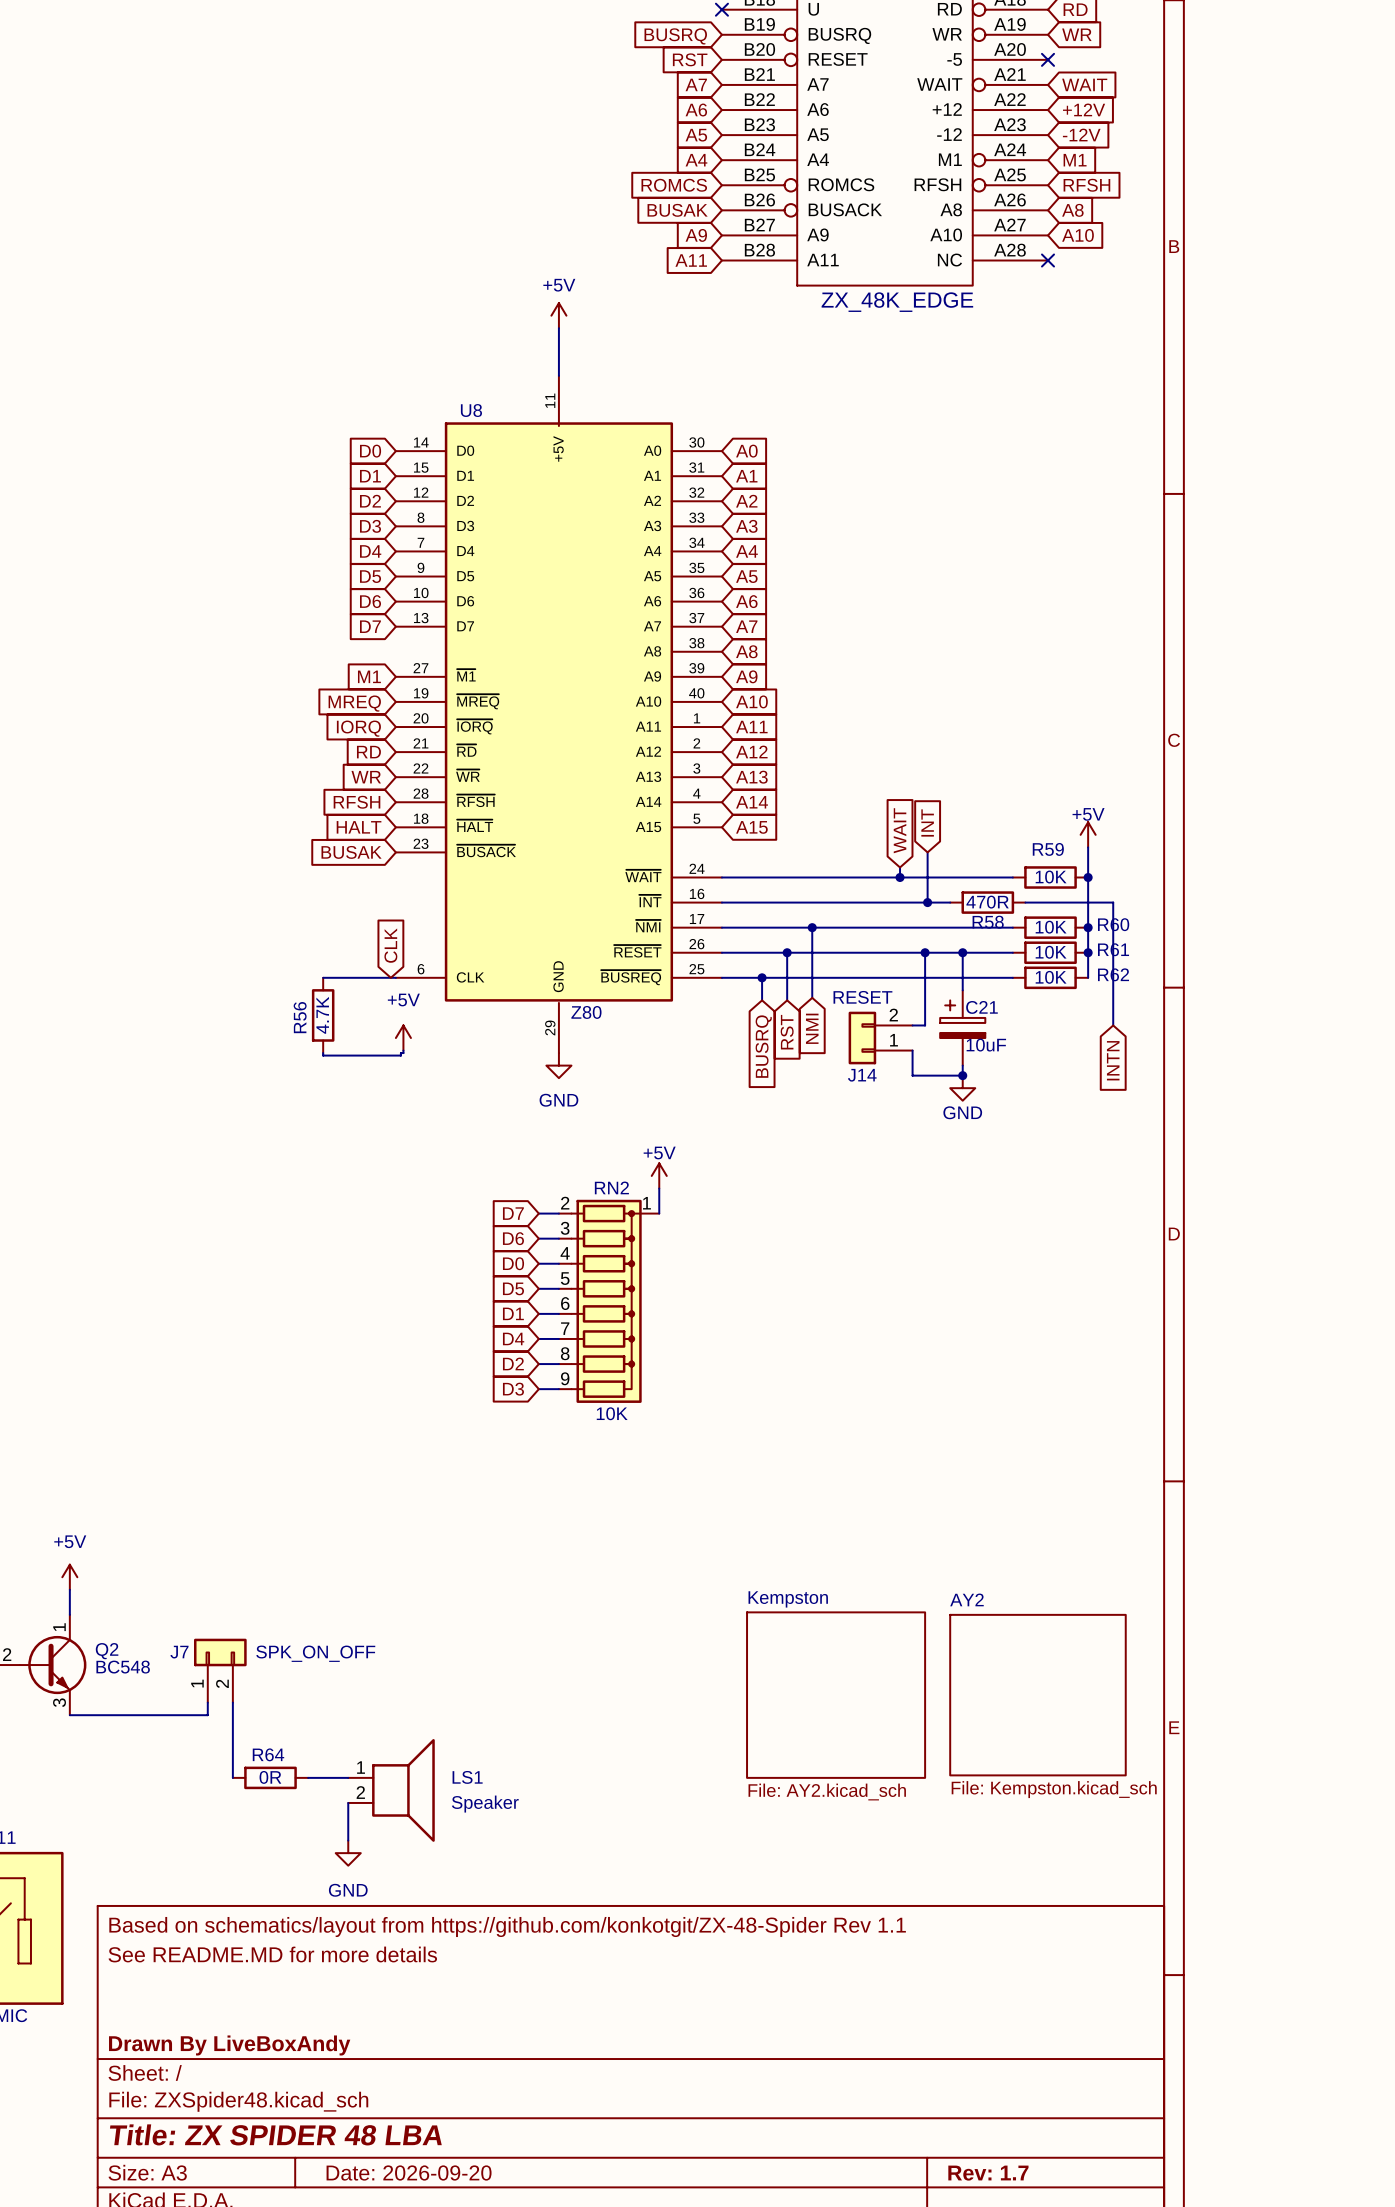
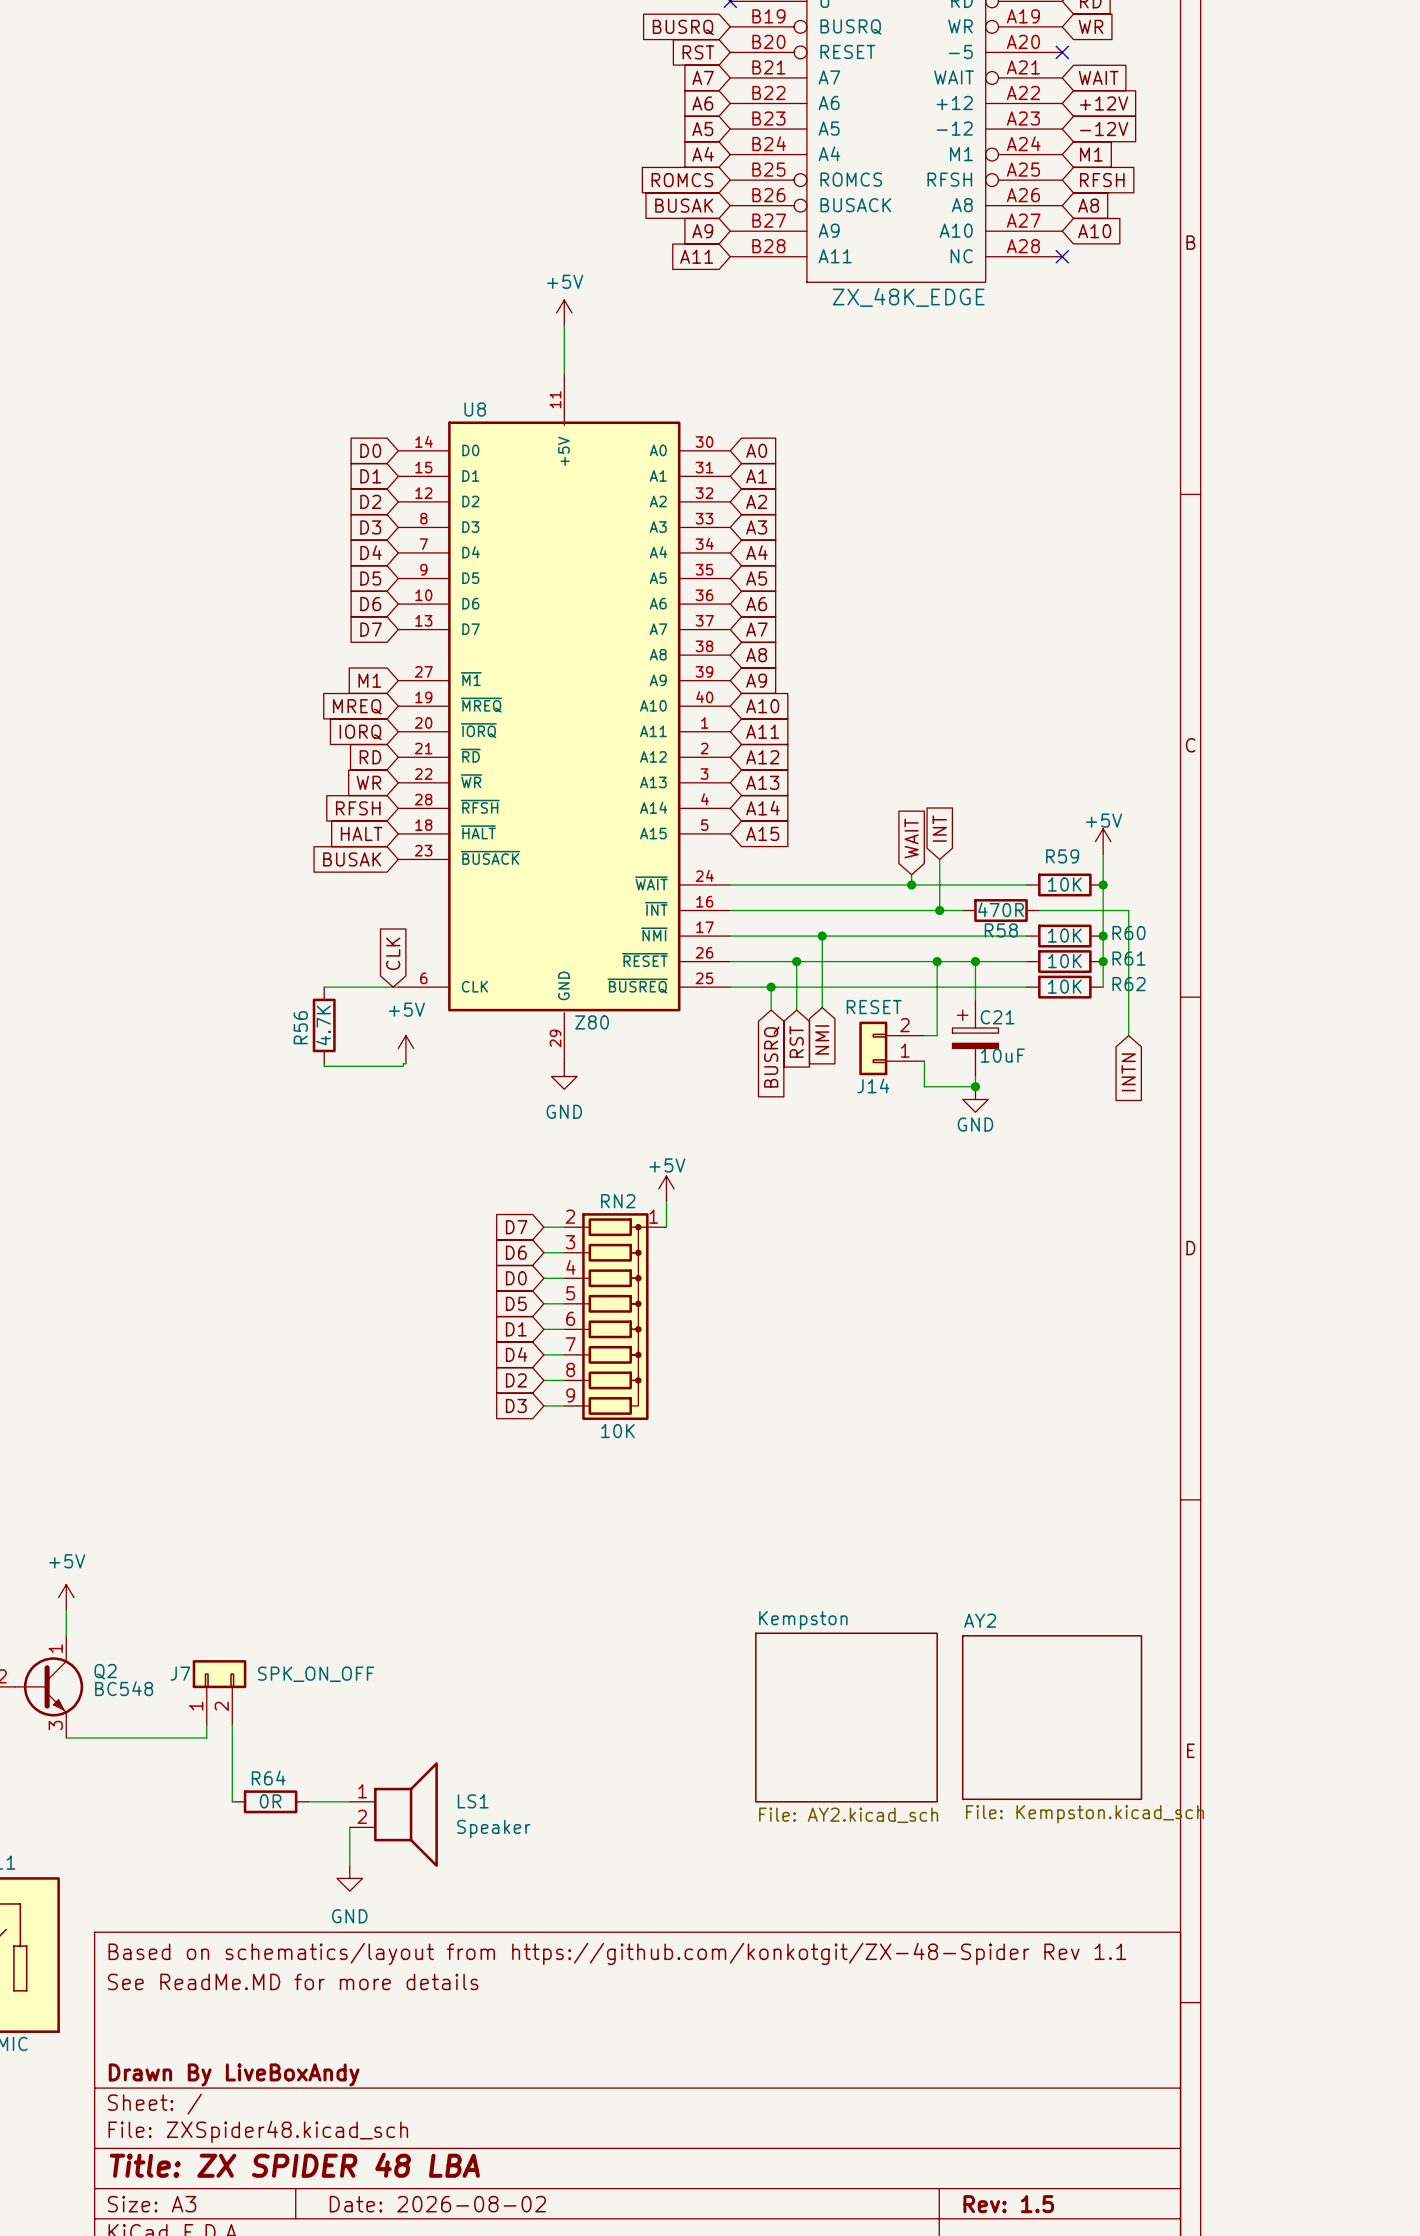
title block: See README.MD for more details (272, 1954) -> See ReadMe.MD for more details (293, 1981)
title block: Date: 2026-09-20 (409, 2173) -> Date: 2026-08-02 (437, 2204)
title block: Rev: 1.7 (988, 2173) -> Rev: 1.5 (1008, 2204)

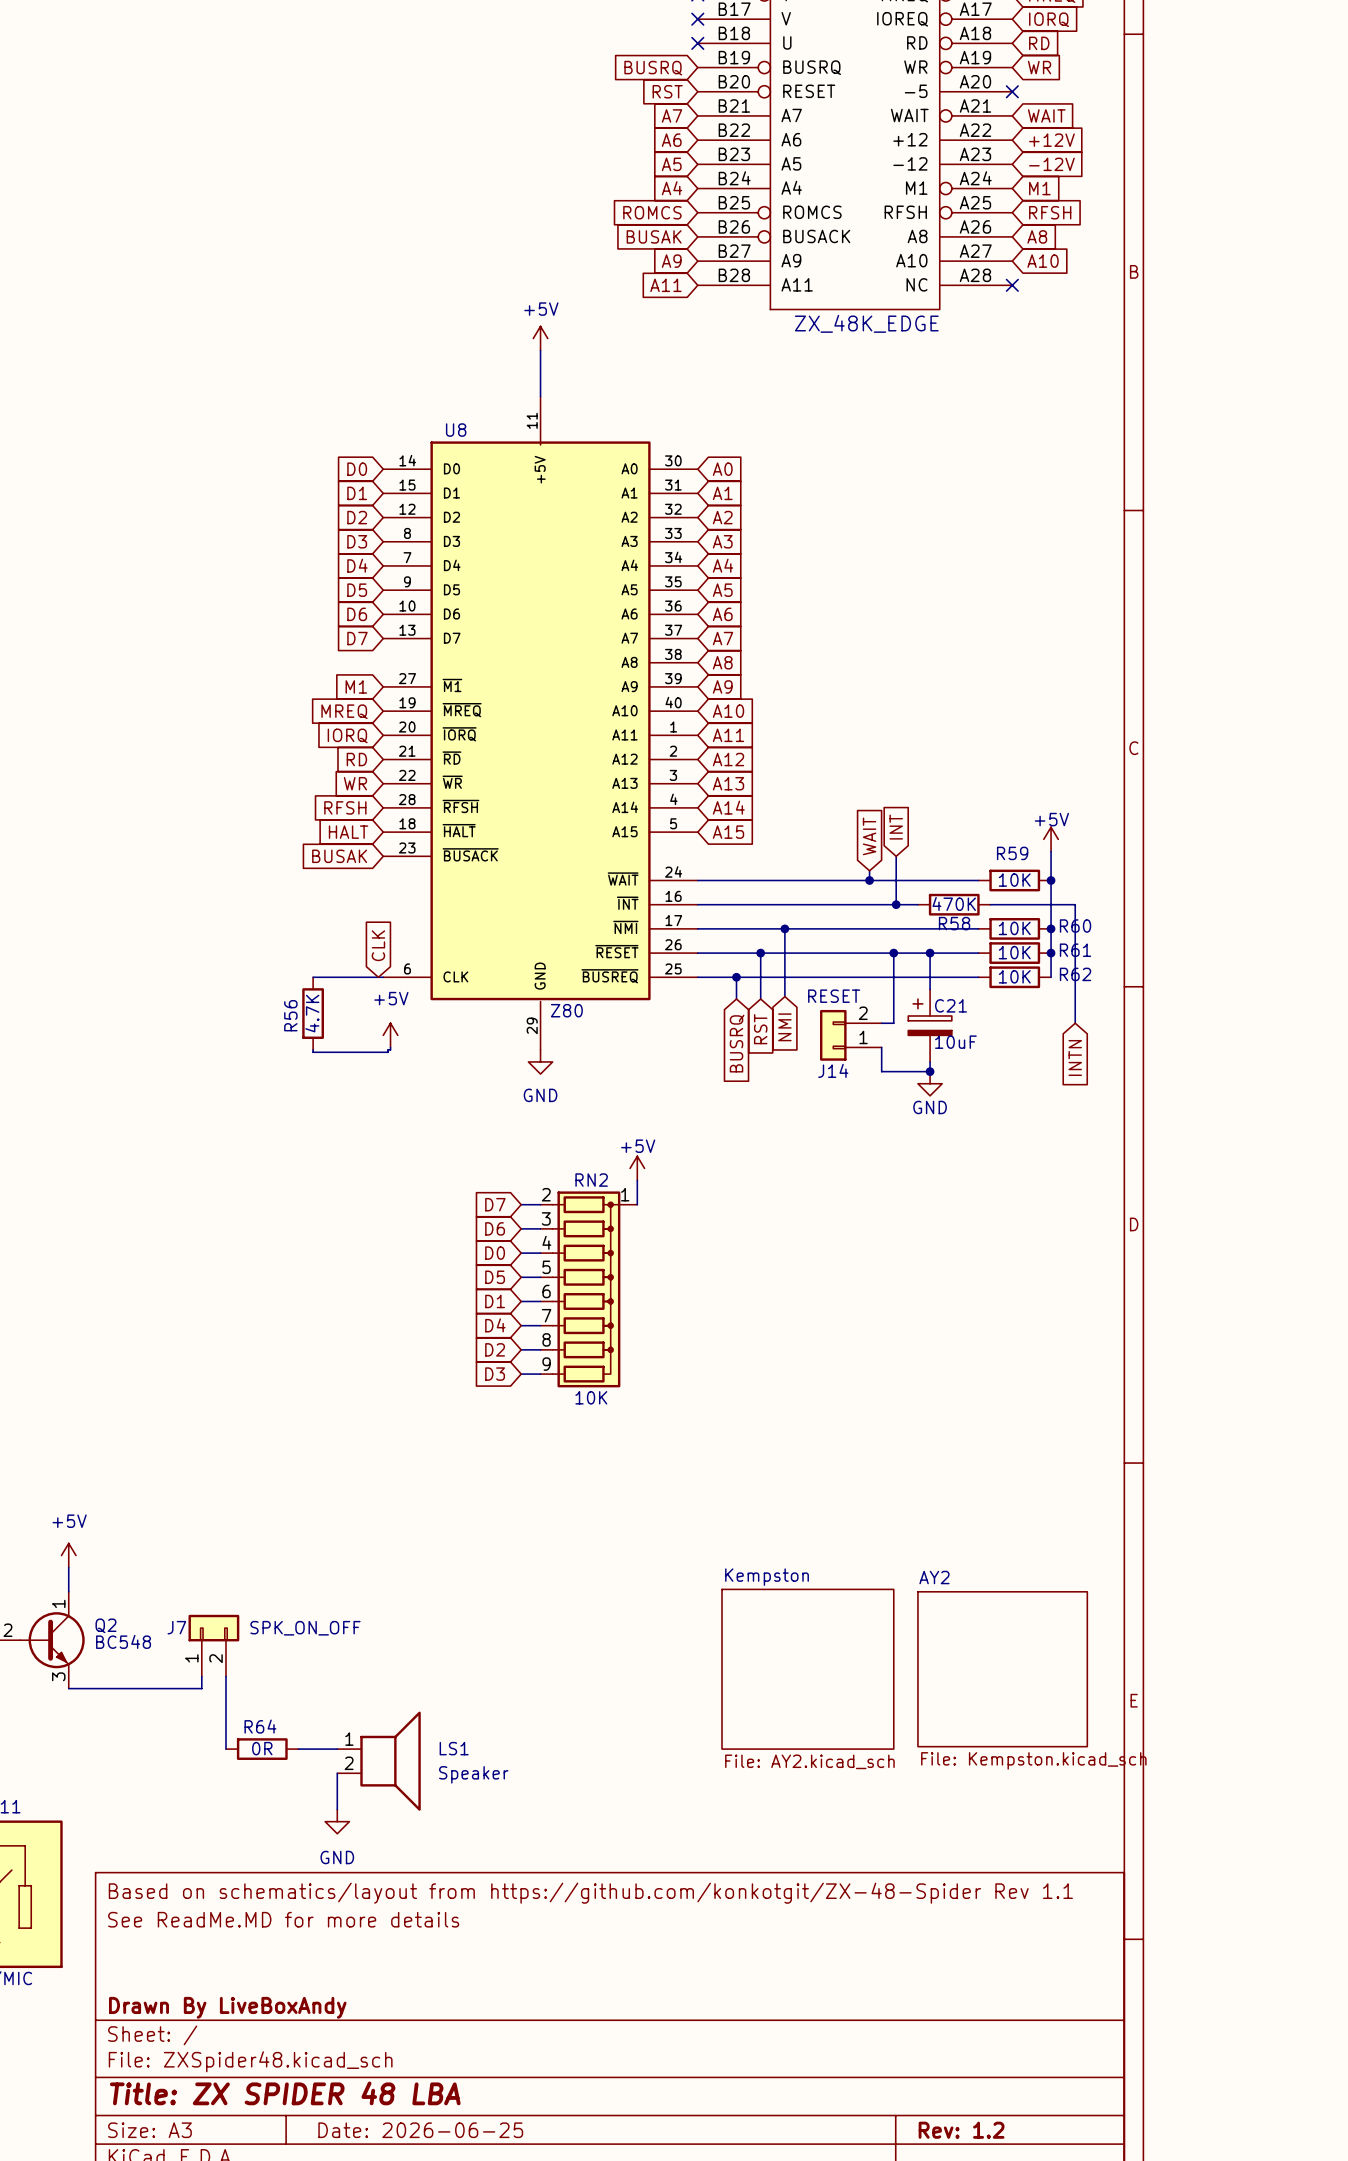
R58 value: 470R (1001, 909) -> 470K (954, 903)
title block: Date: 2026-08-02 (437, 2204) -> Date: 2026-06-25 (420, 2130)
title block: Rev: 1.5 (1008, 2204) -> Rev: 1.2 (961, 2130)

